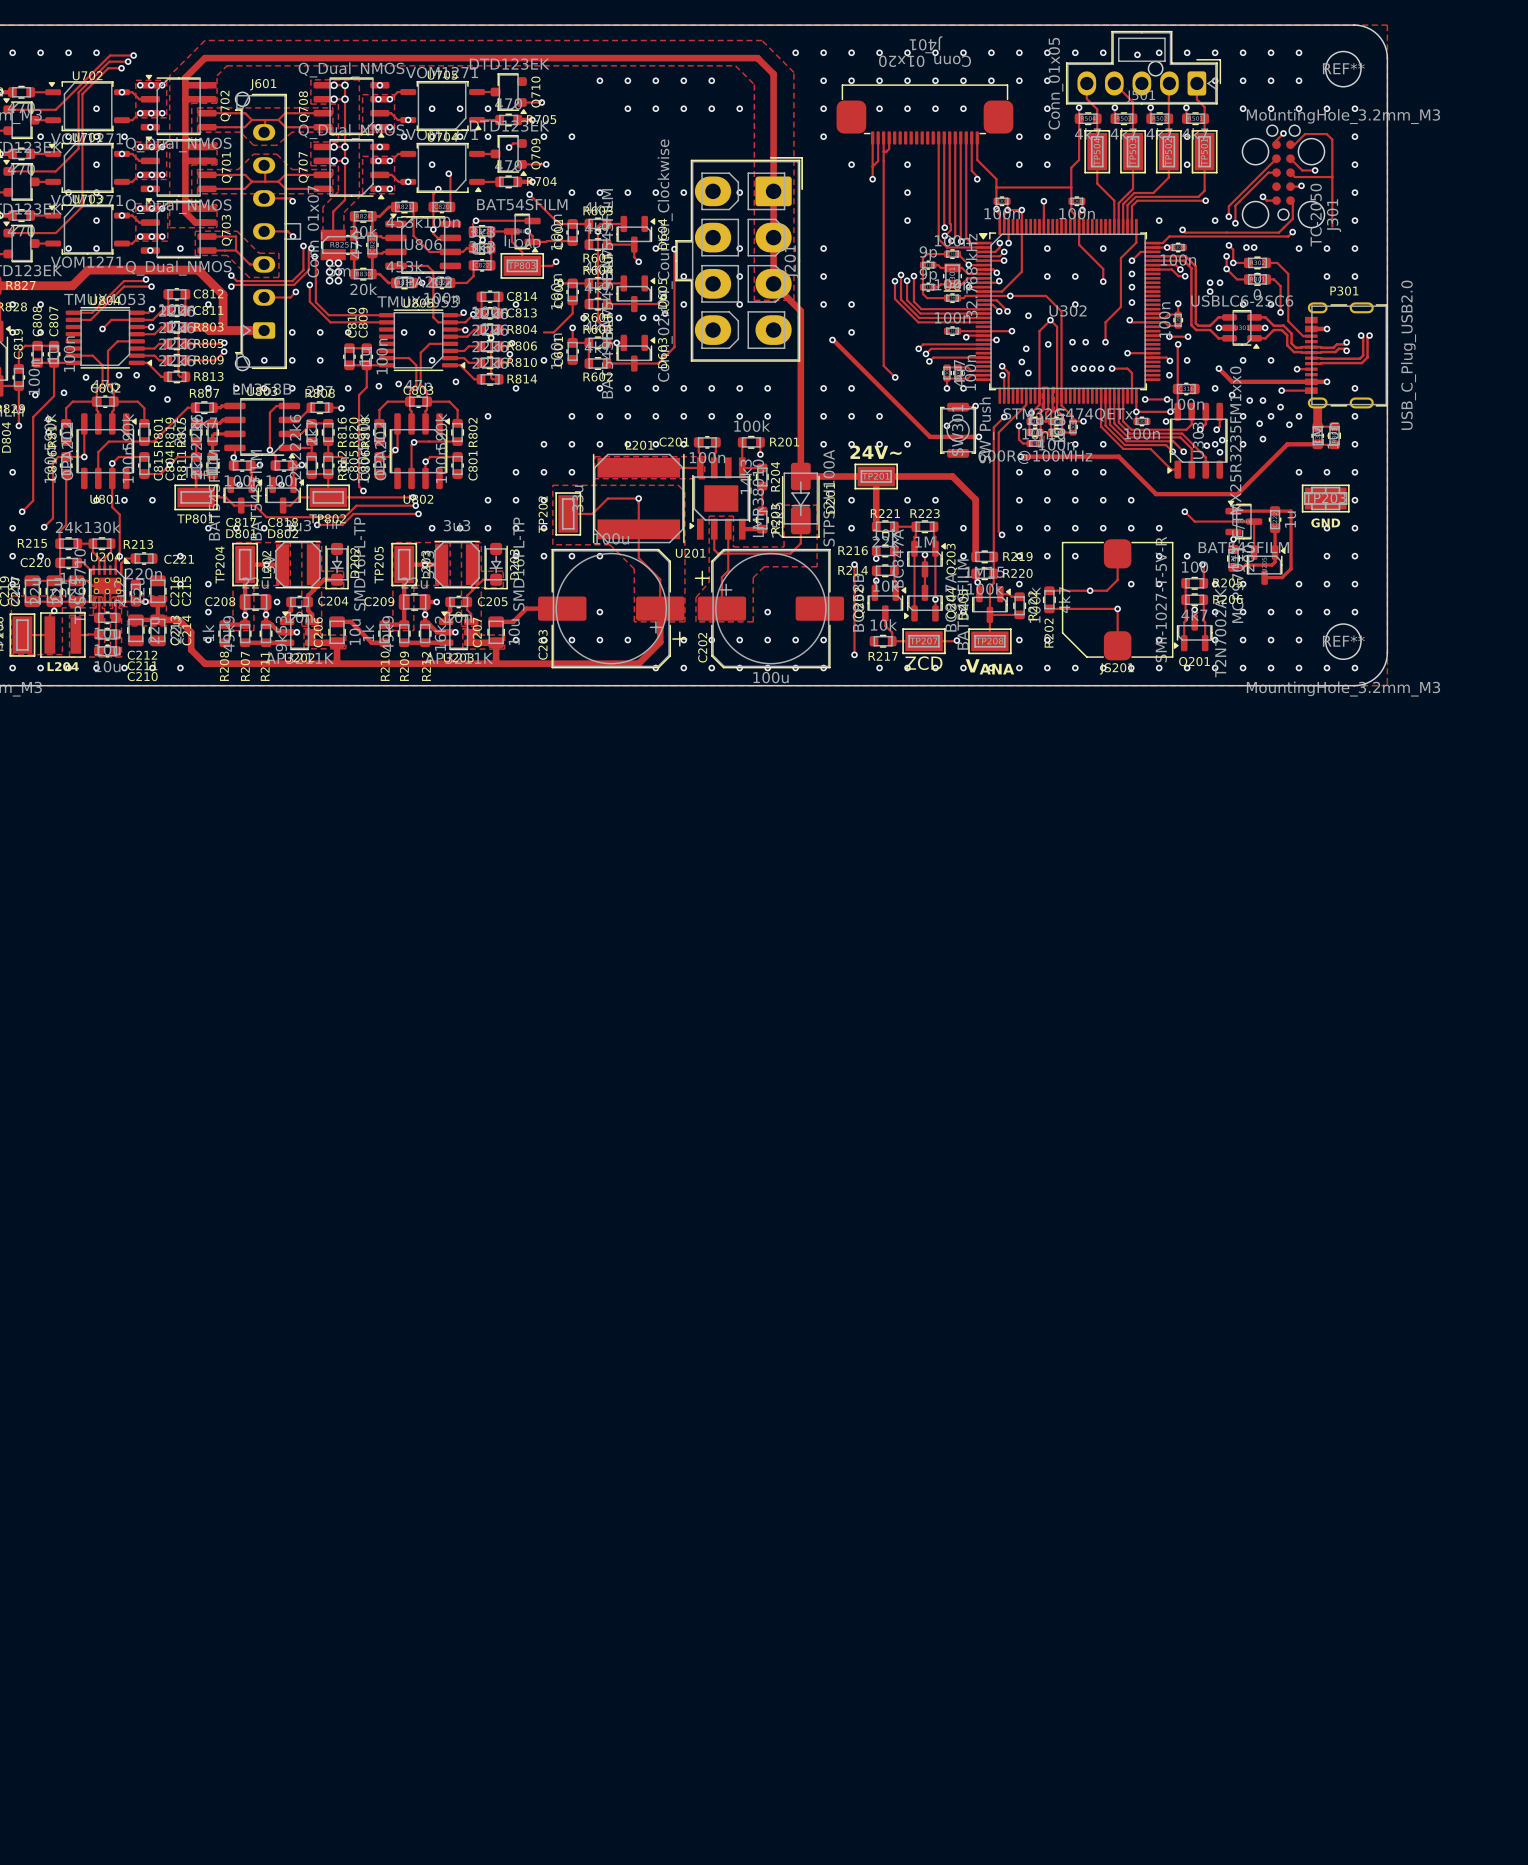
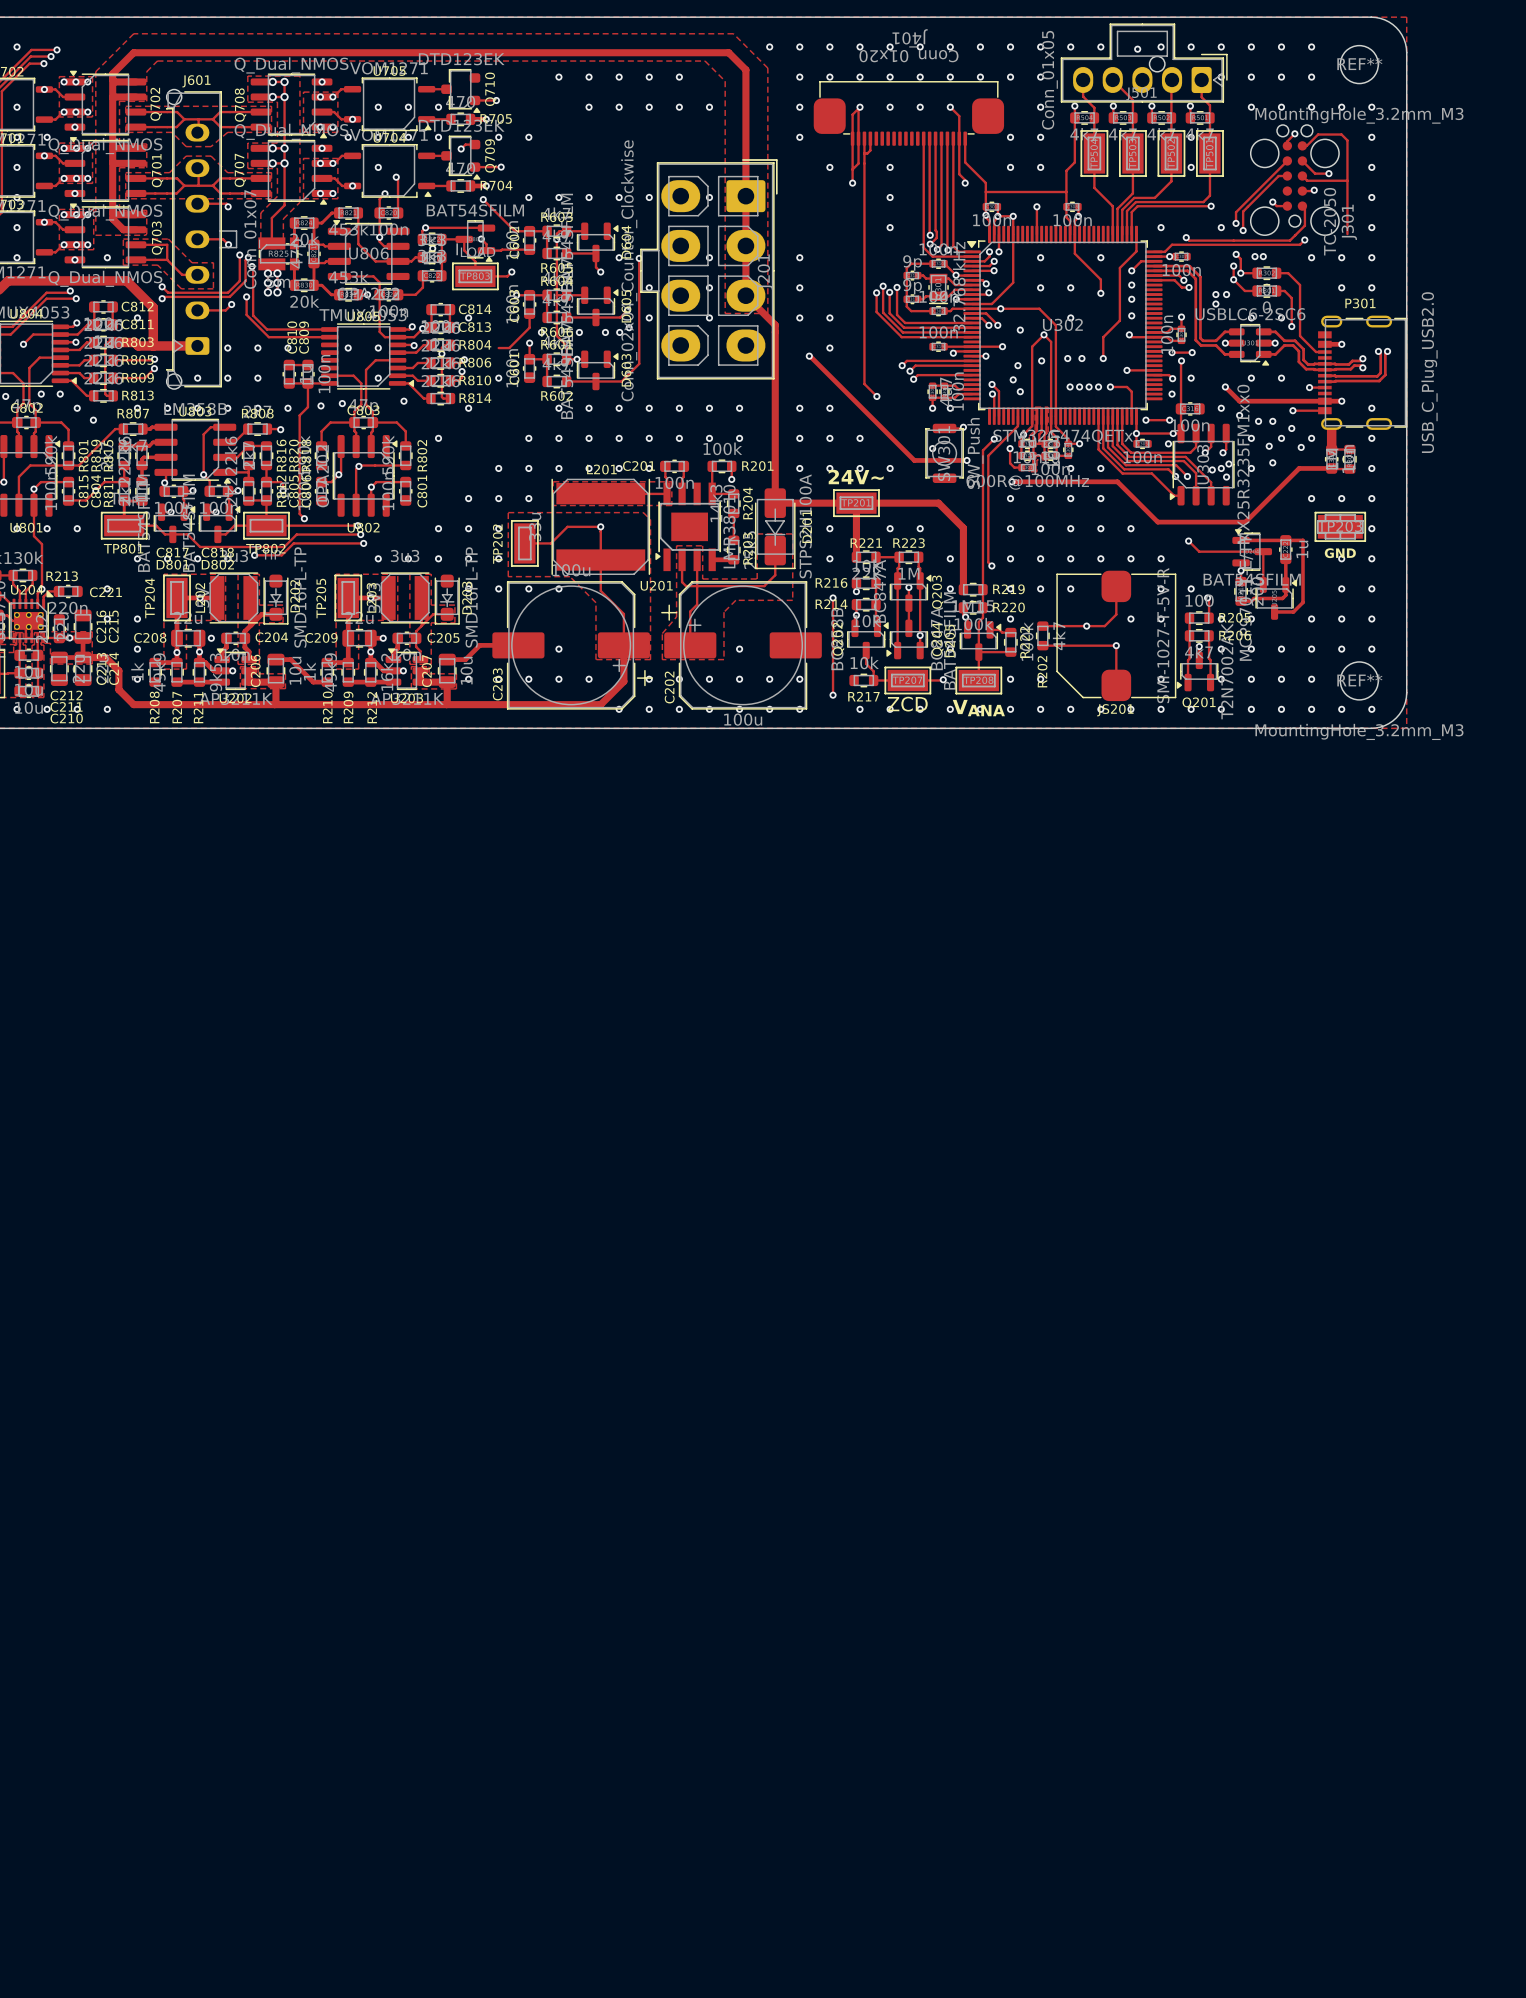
track: none -> (860, 107) (852, 114) (852, 138)
track: none -> (950, 107) (959, 116) (959, 138)
track: none -> (858, 108) (858, 138)

